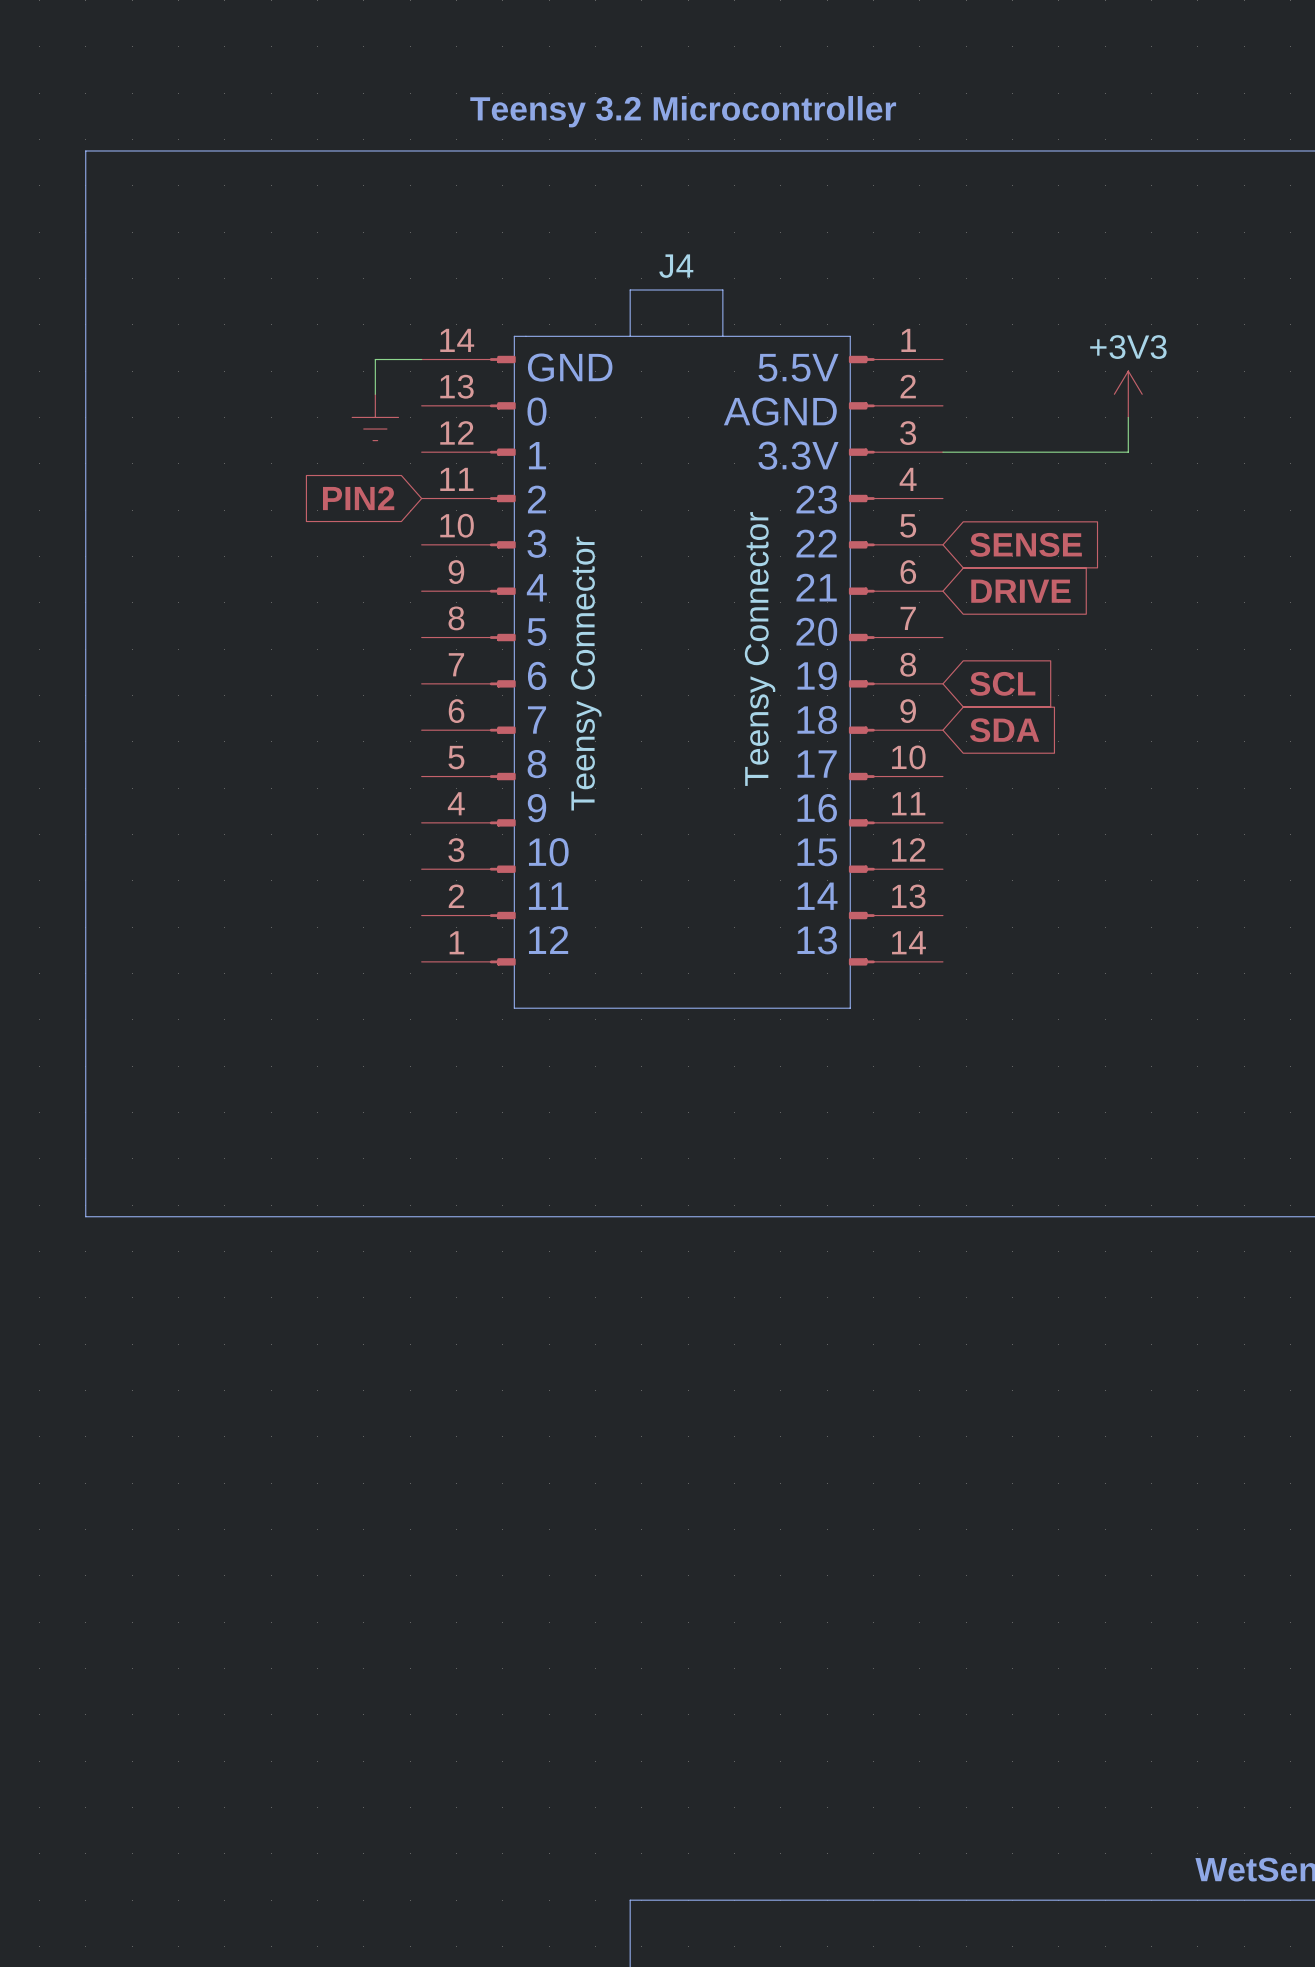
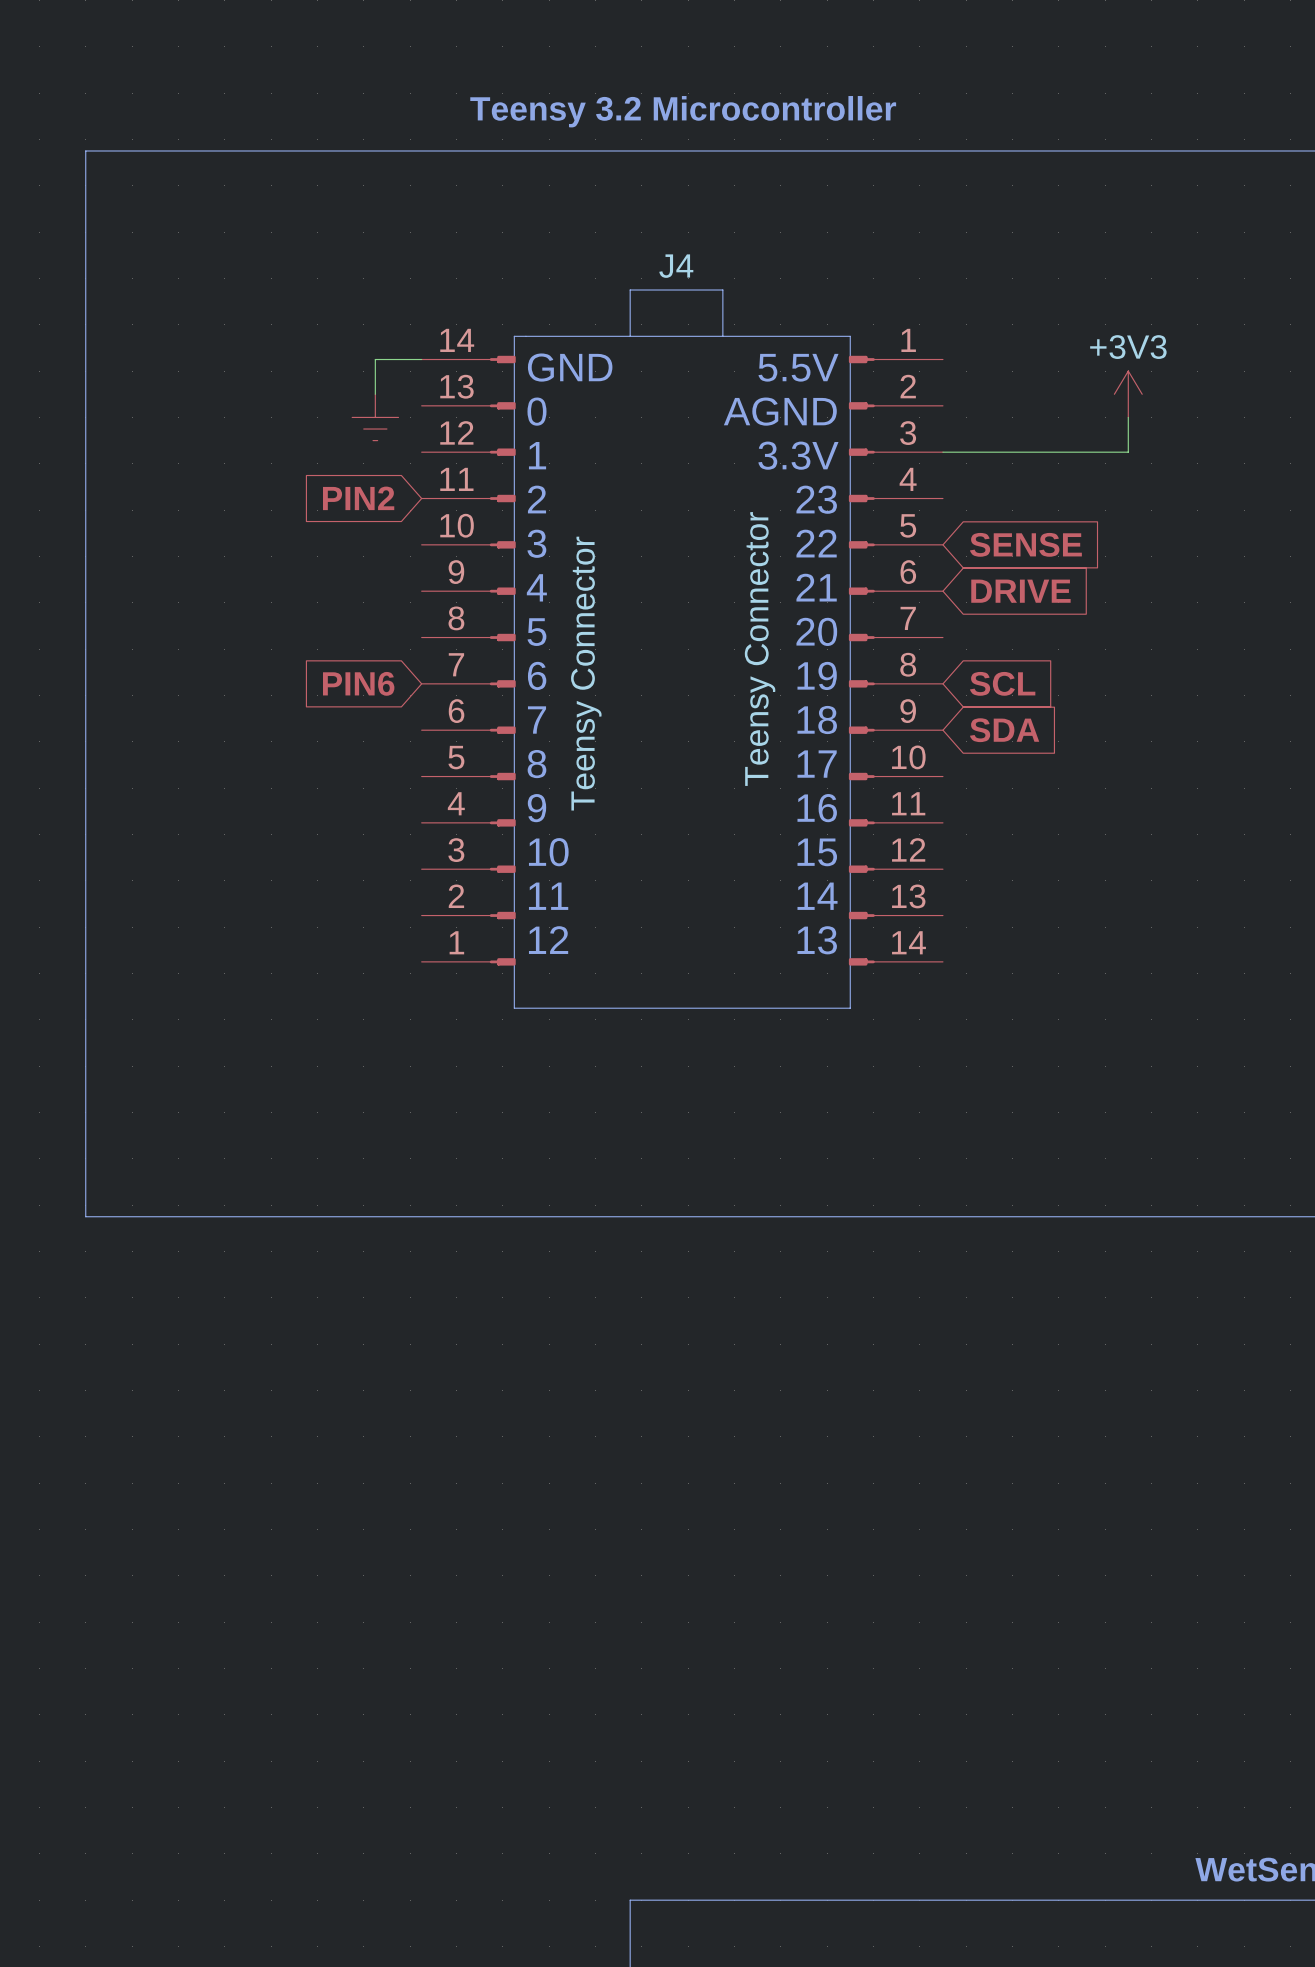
global label: none -> PIN6 (358, 683)

